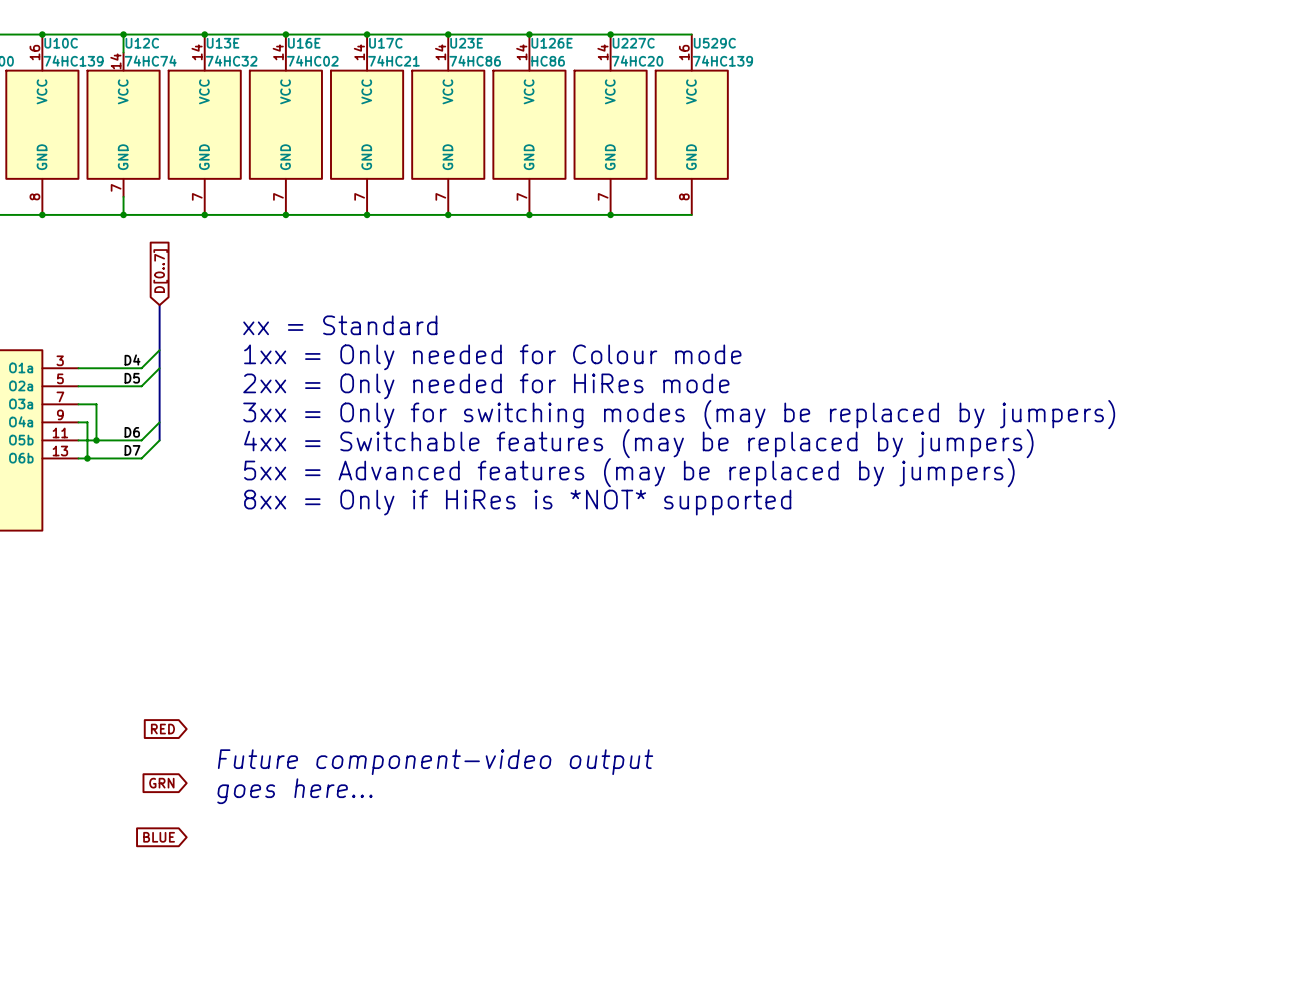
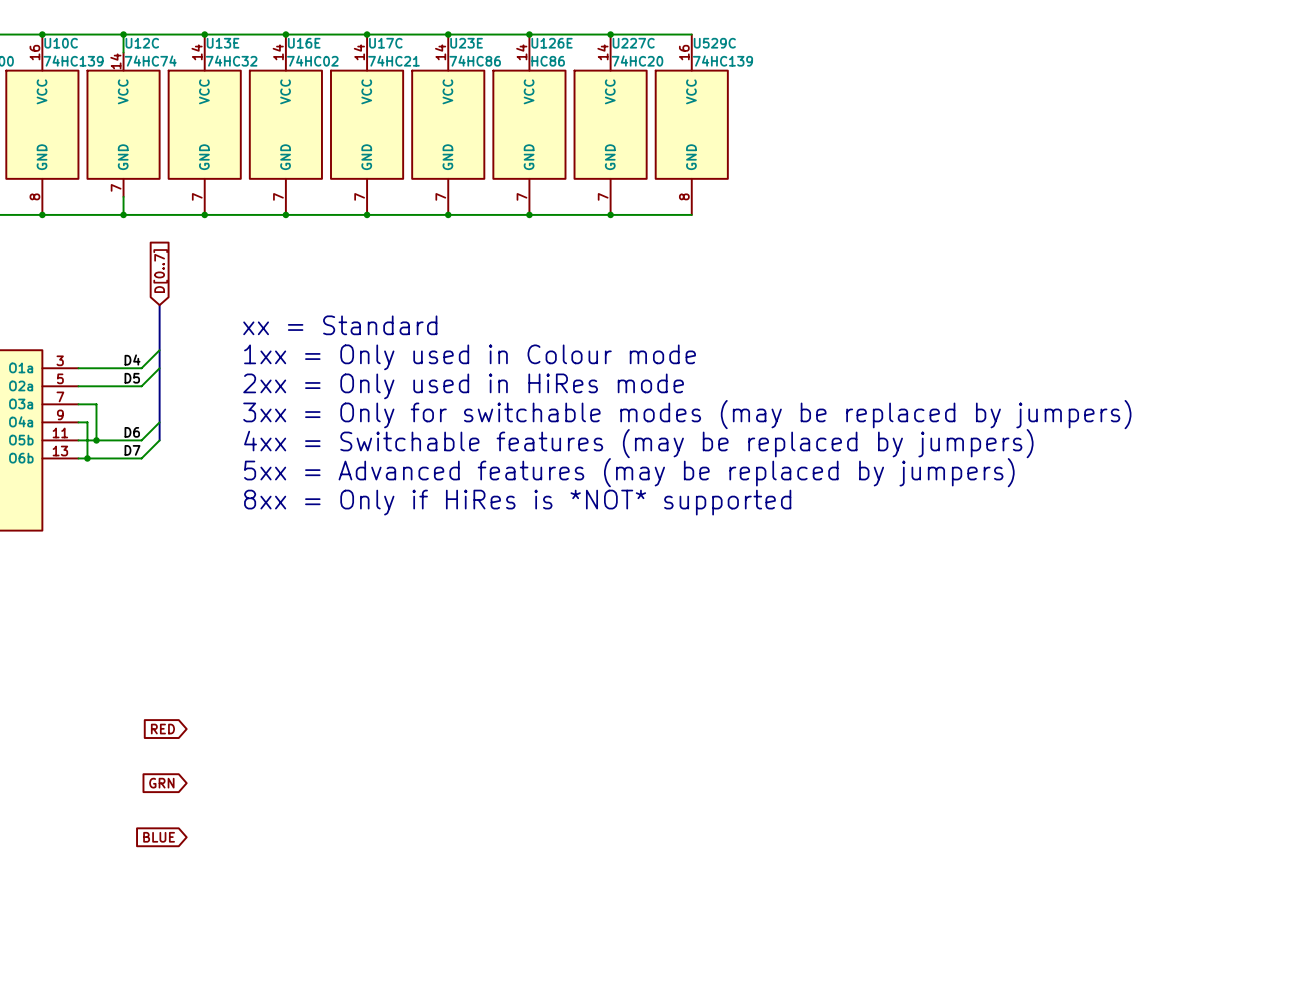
text: 1xx = Only needed for Colour mode (492, 357) -> 1xx = Only used in Colour mode (470, 357)
text: 2xx = Only needed for HiRes mode (486, 386) -> 2xx = Only used in HiRes mode (463, 386)
text: 3xx = Only for switching modes (may be replaced by jumpers) (679, 414) -> 3xx = Only for switchable modes (may be replaced by jumpers) (687, 414)
text: Future component-video output (435, 762) -> none
text: goes here… (294, 791) -> none

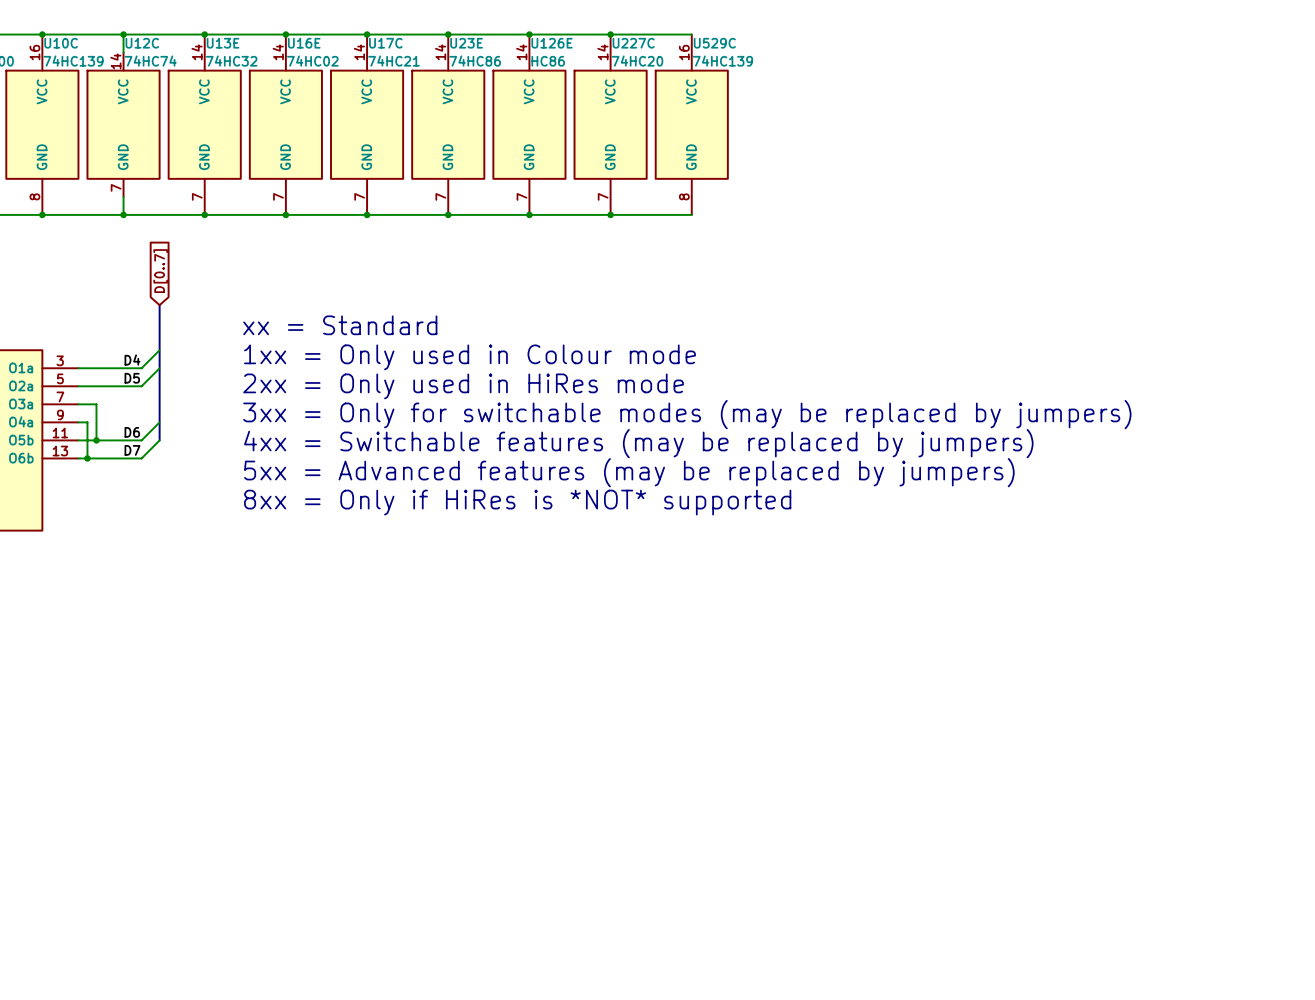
global label: RED (162, 729) -> none
global label: GRN (161, 783) -> none
global label: BLUE (159, 837) -> none

